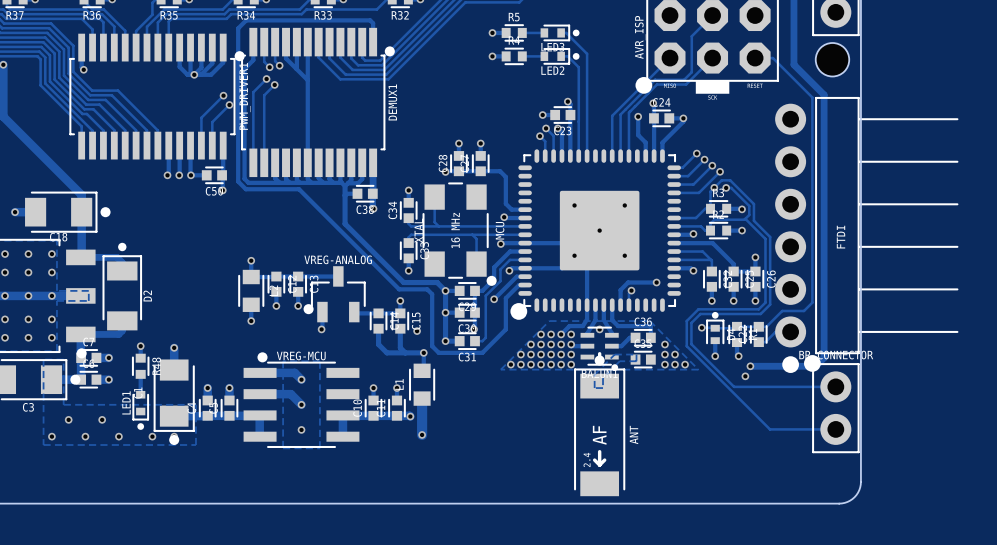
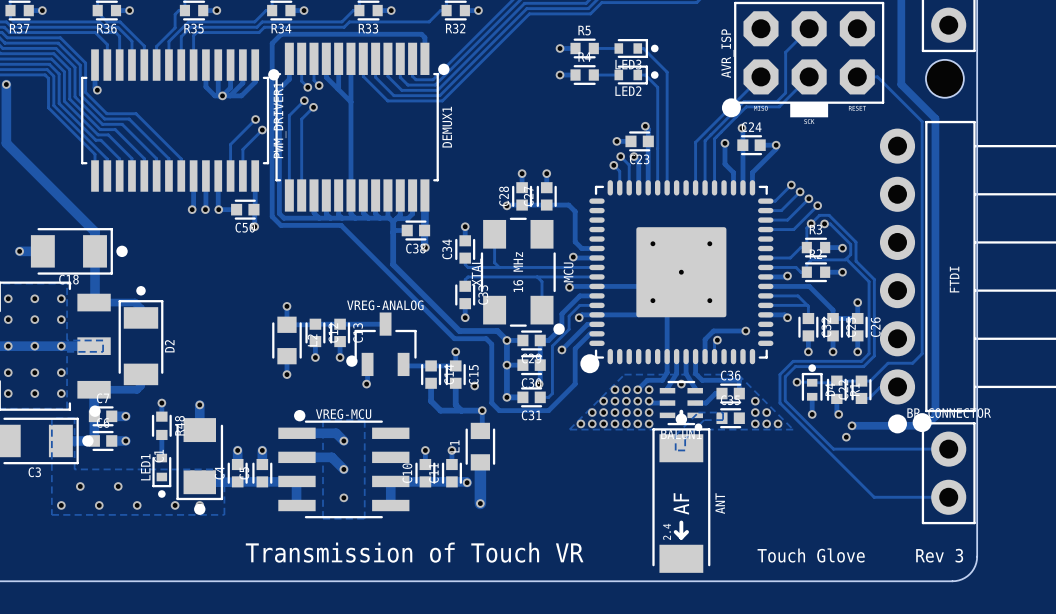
text: none -> Transmission of Touch VR (414, 552)
text: none -> Touch Glove Rev 3 (860, 555)

